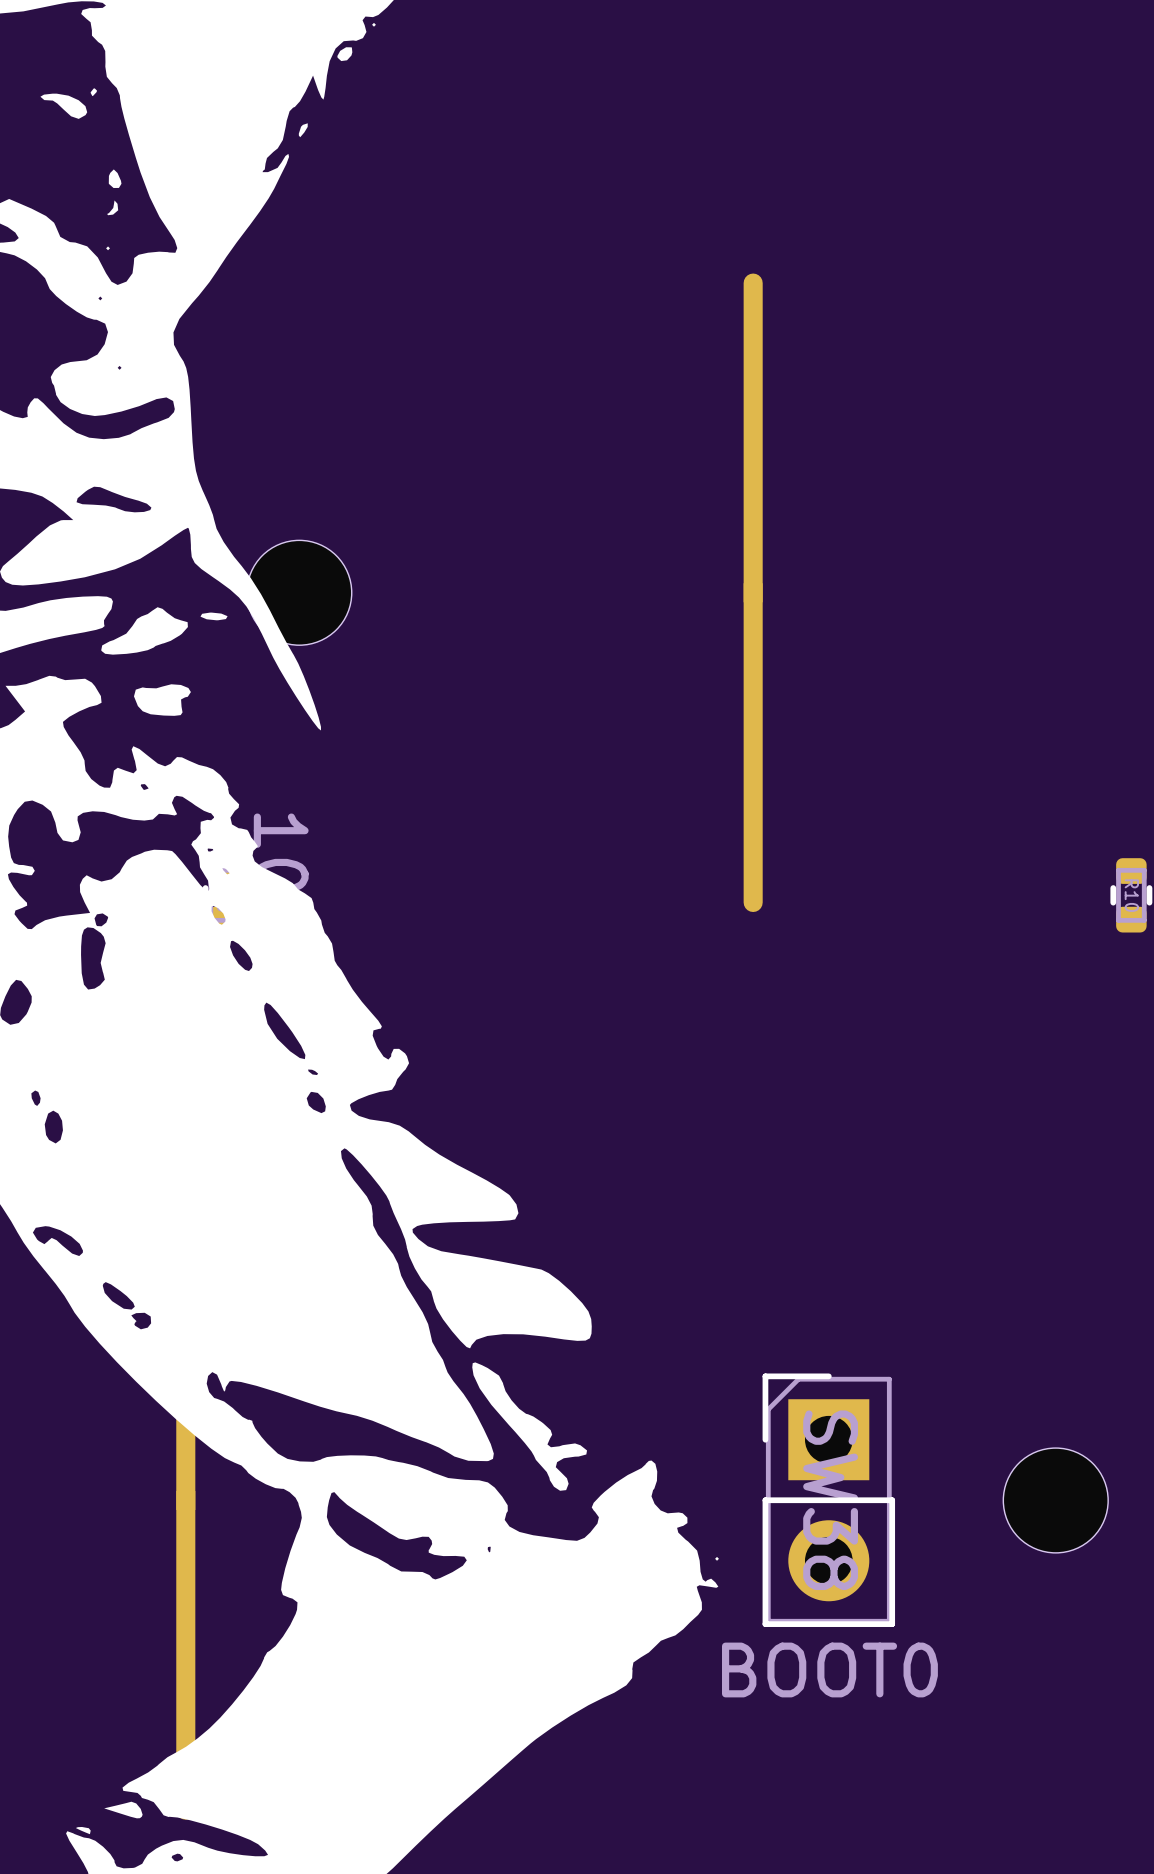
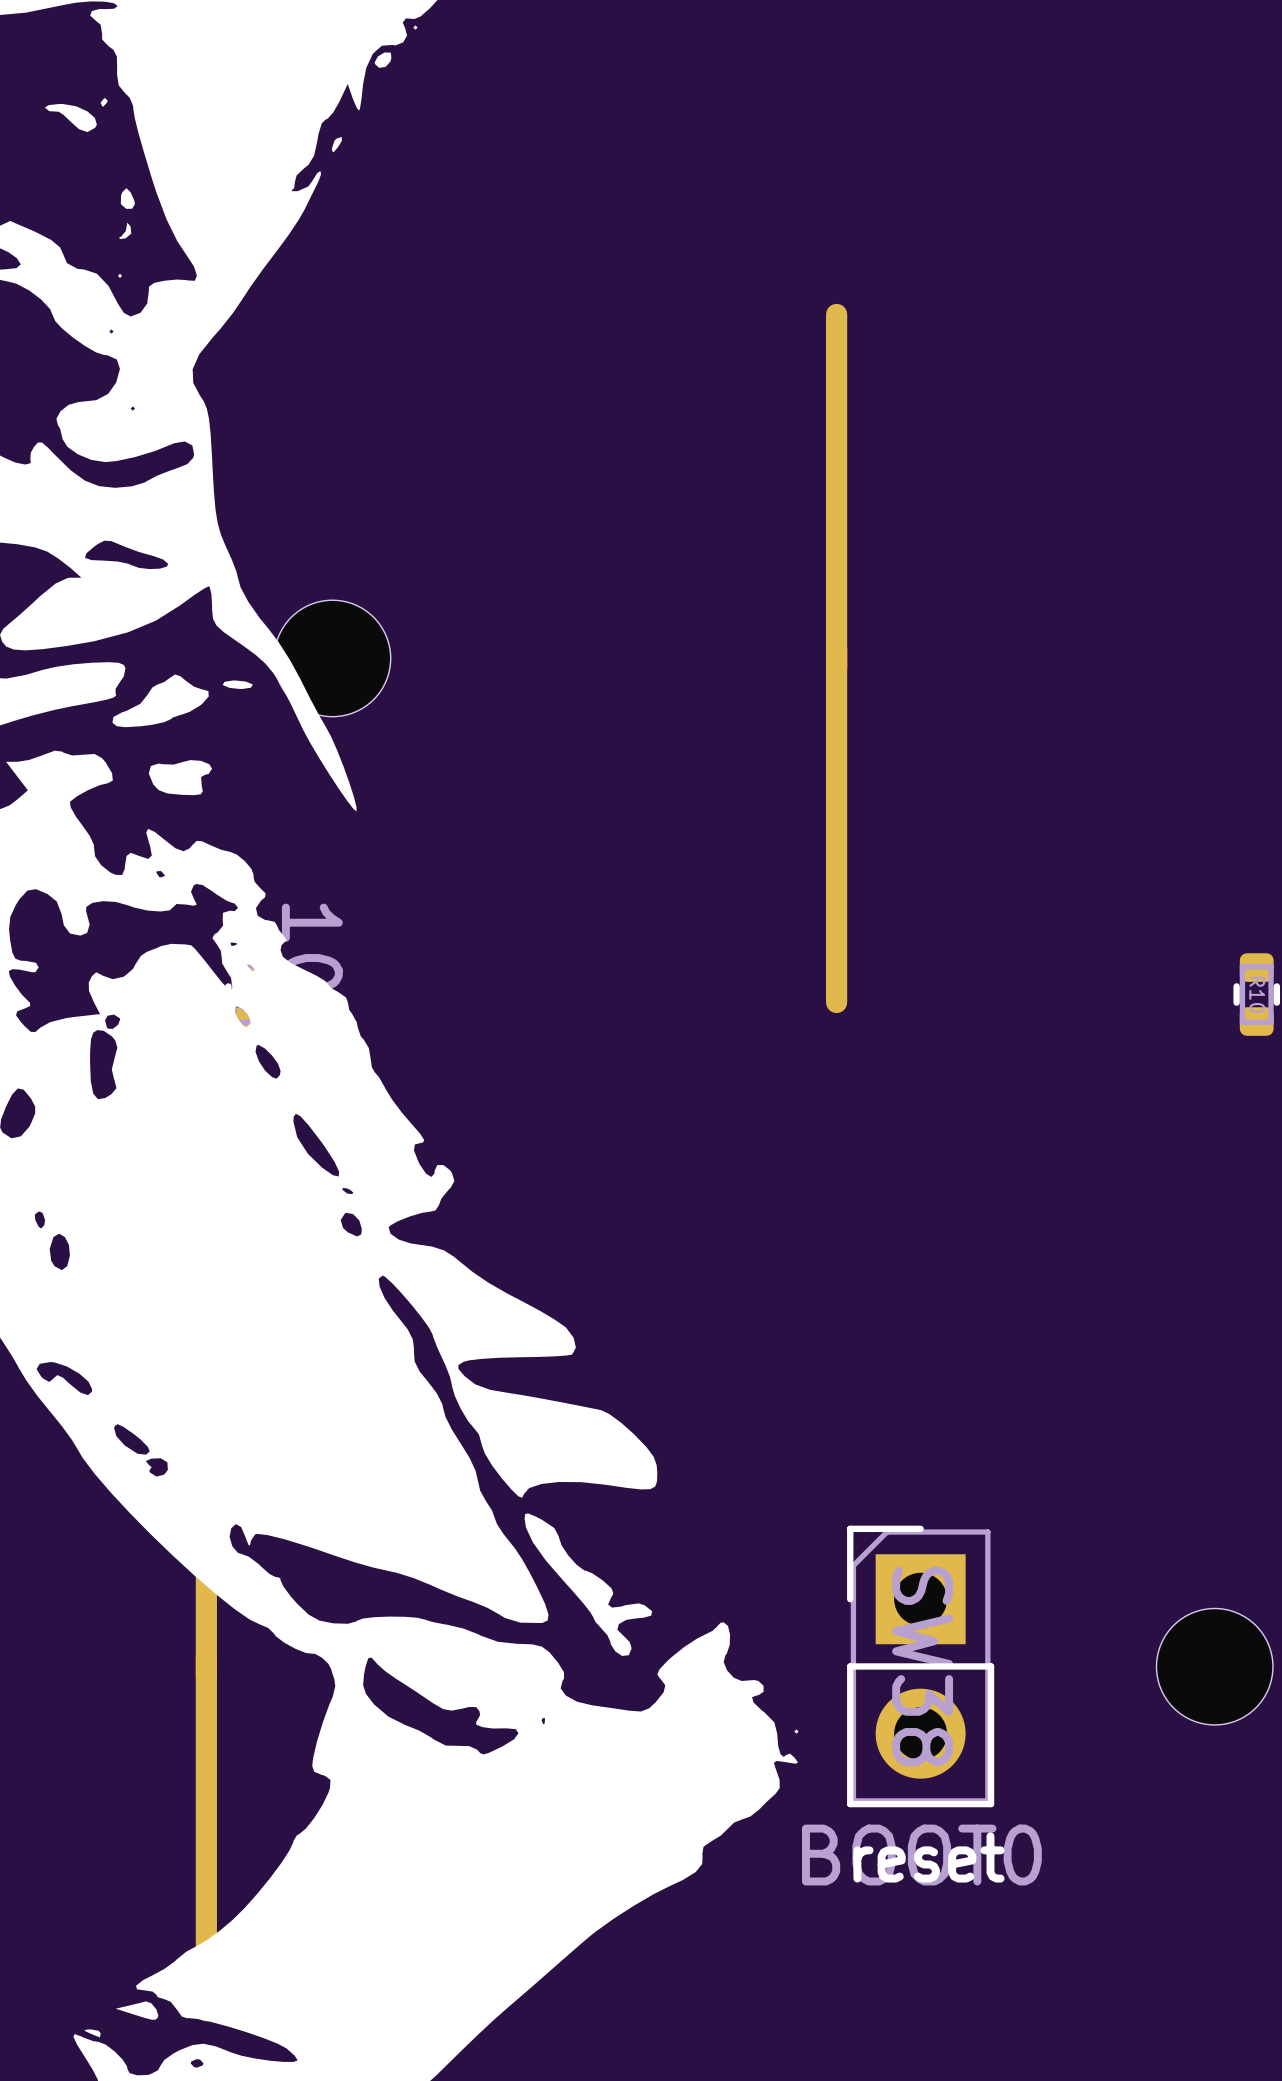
part position: (1055, 1500) -> (1214, 1666)
text: none -> reset (928, 1857)

